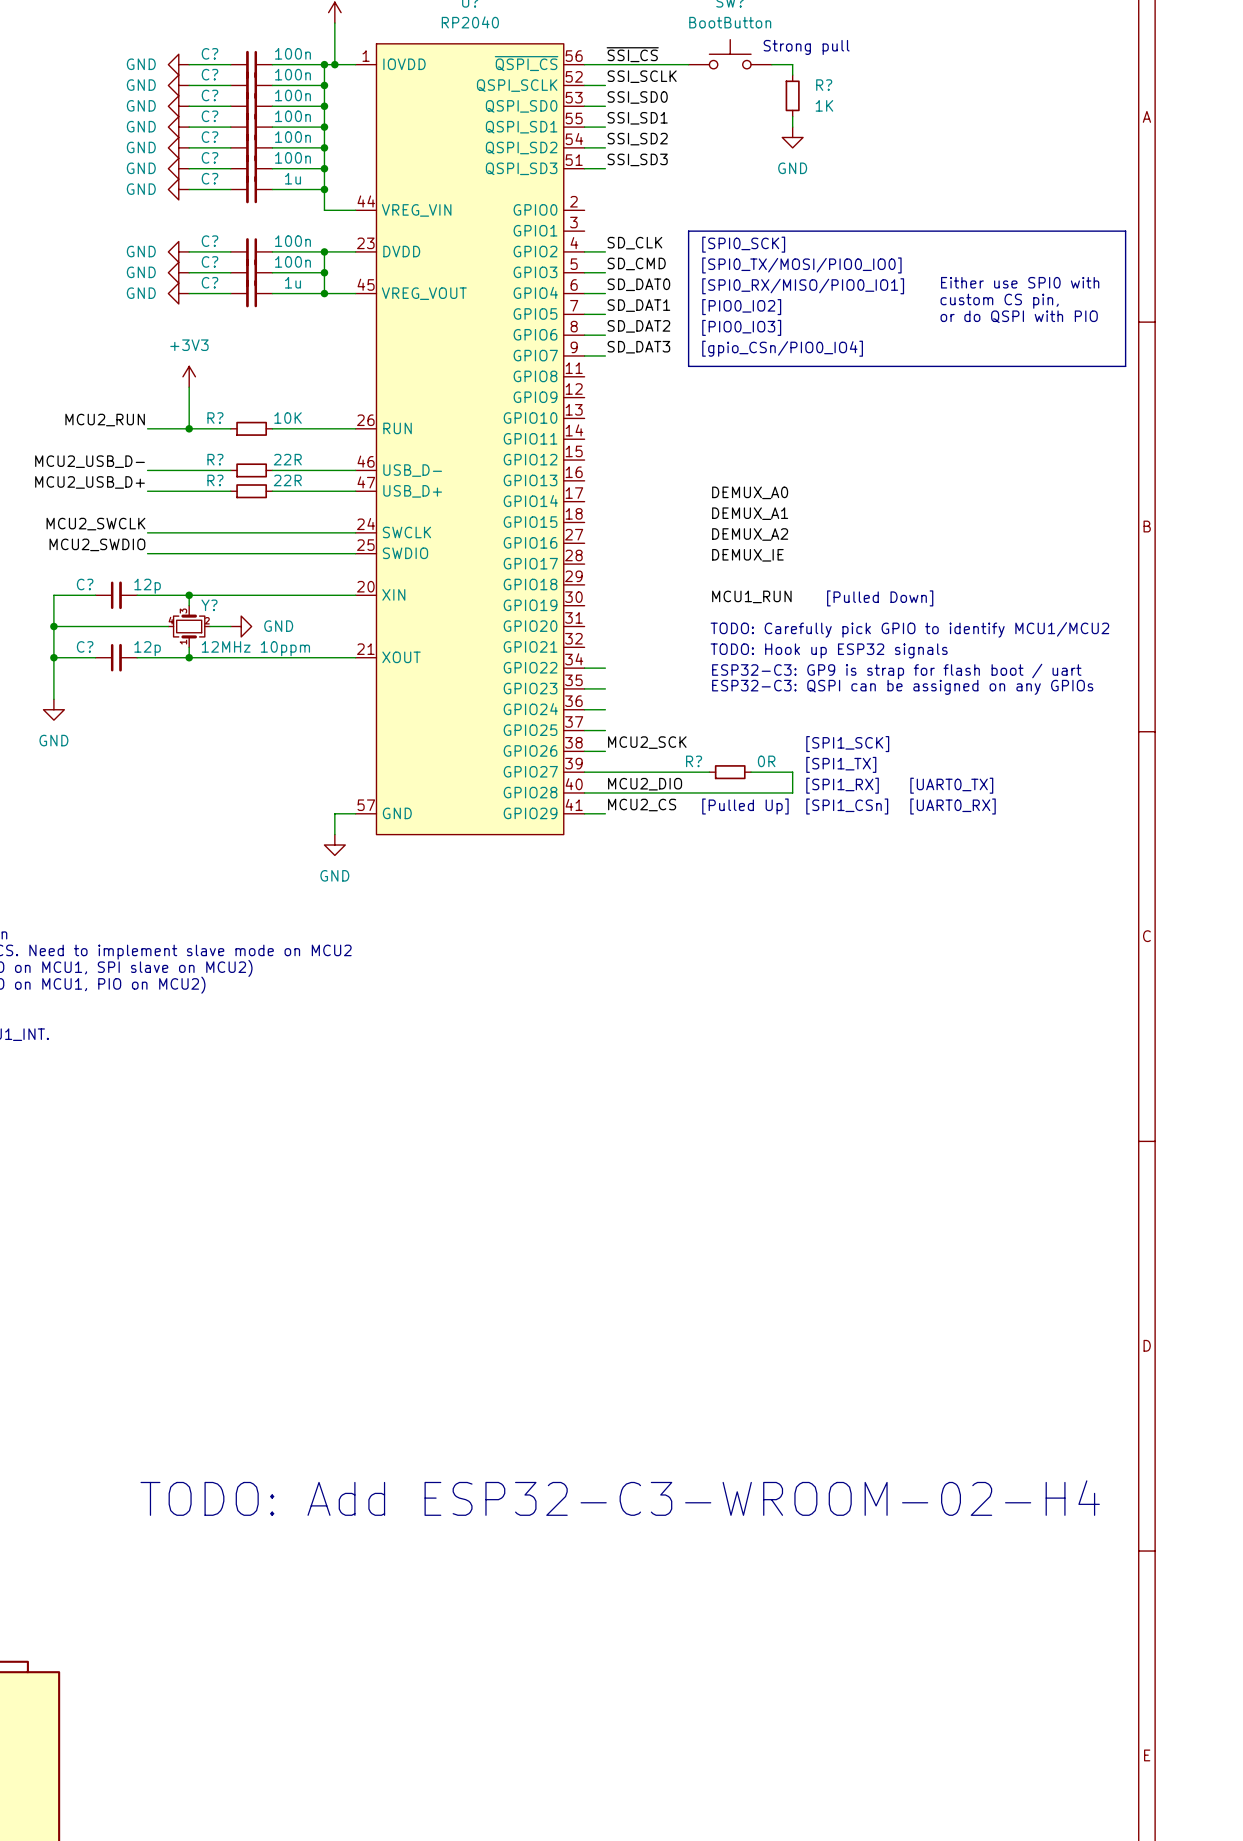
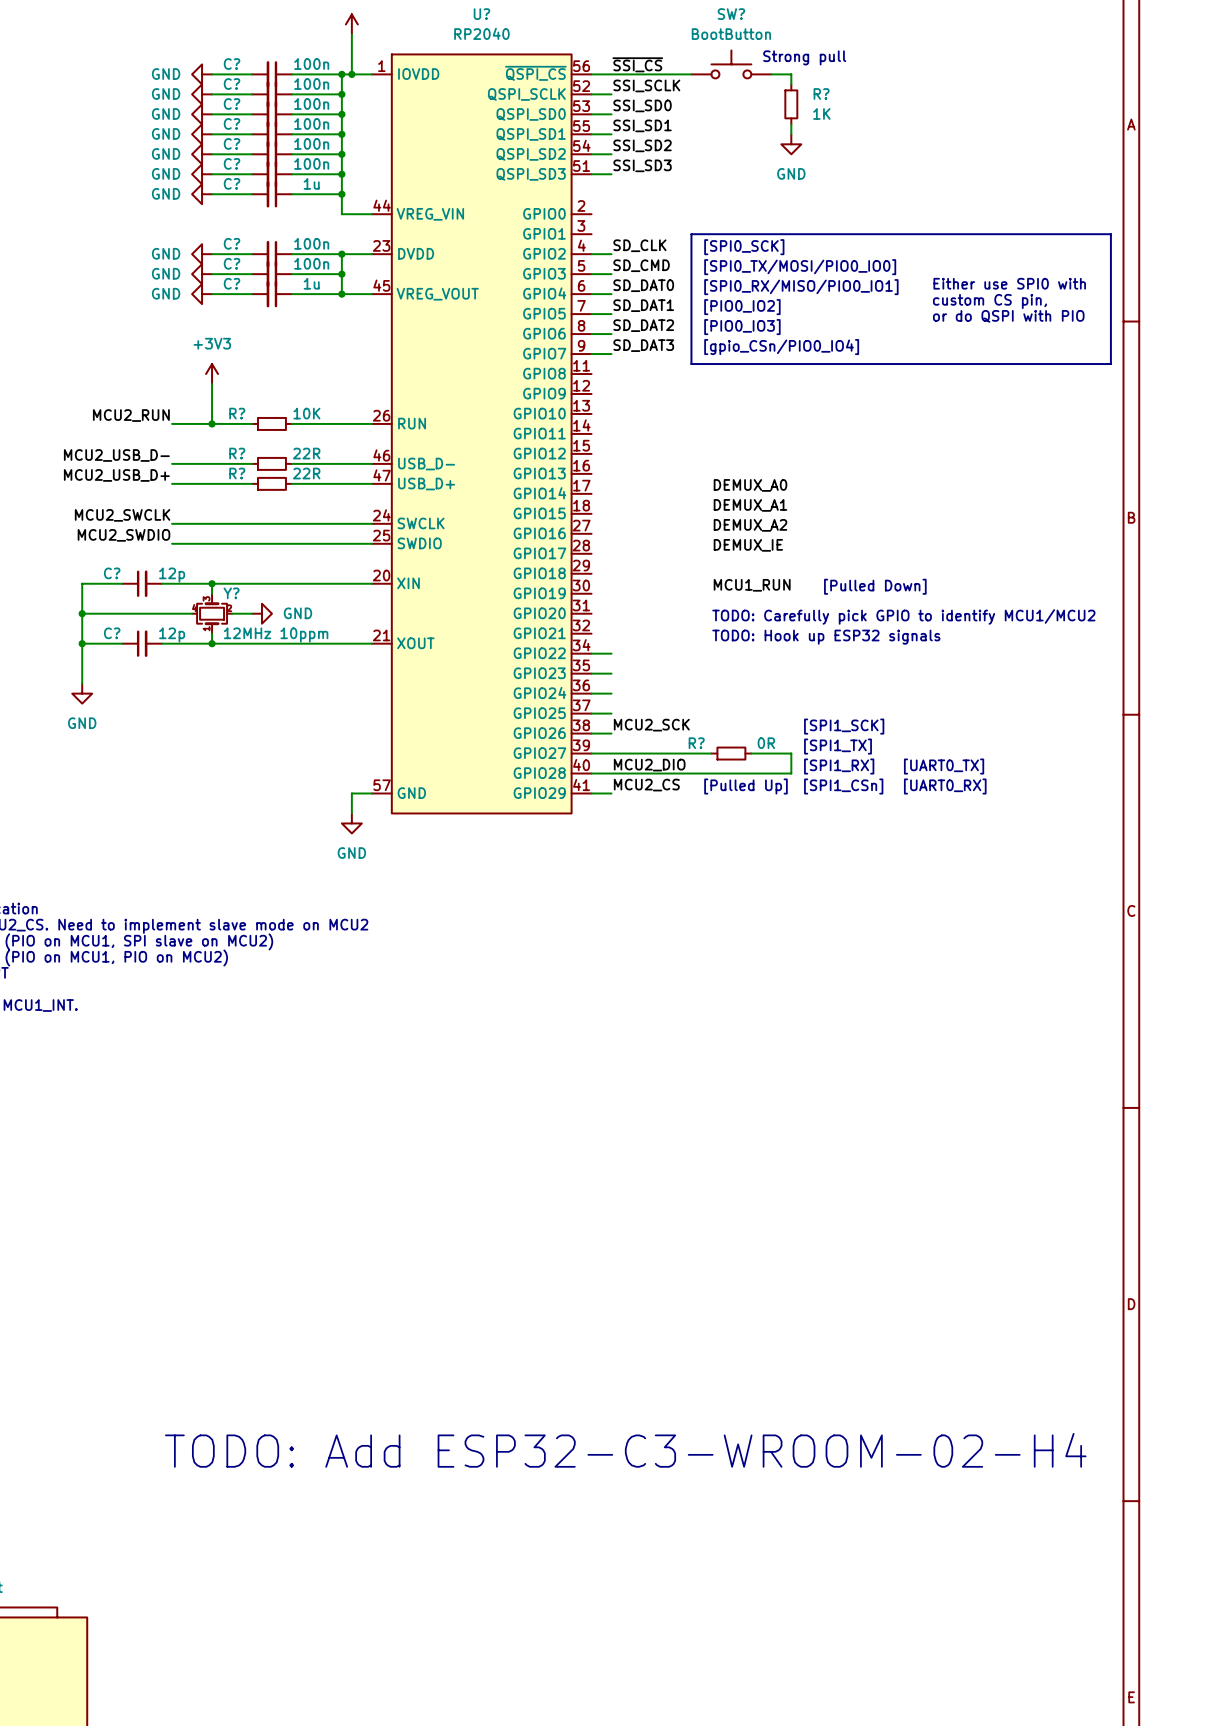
text: ESP32-C3: GP9 is strap for flash boot / uart (896, 671) -> none
text: ESP32-C3: QSPI can be assigned on any GPIOs (902, 687) -> none

